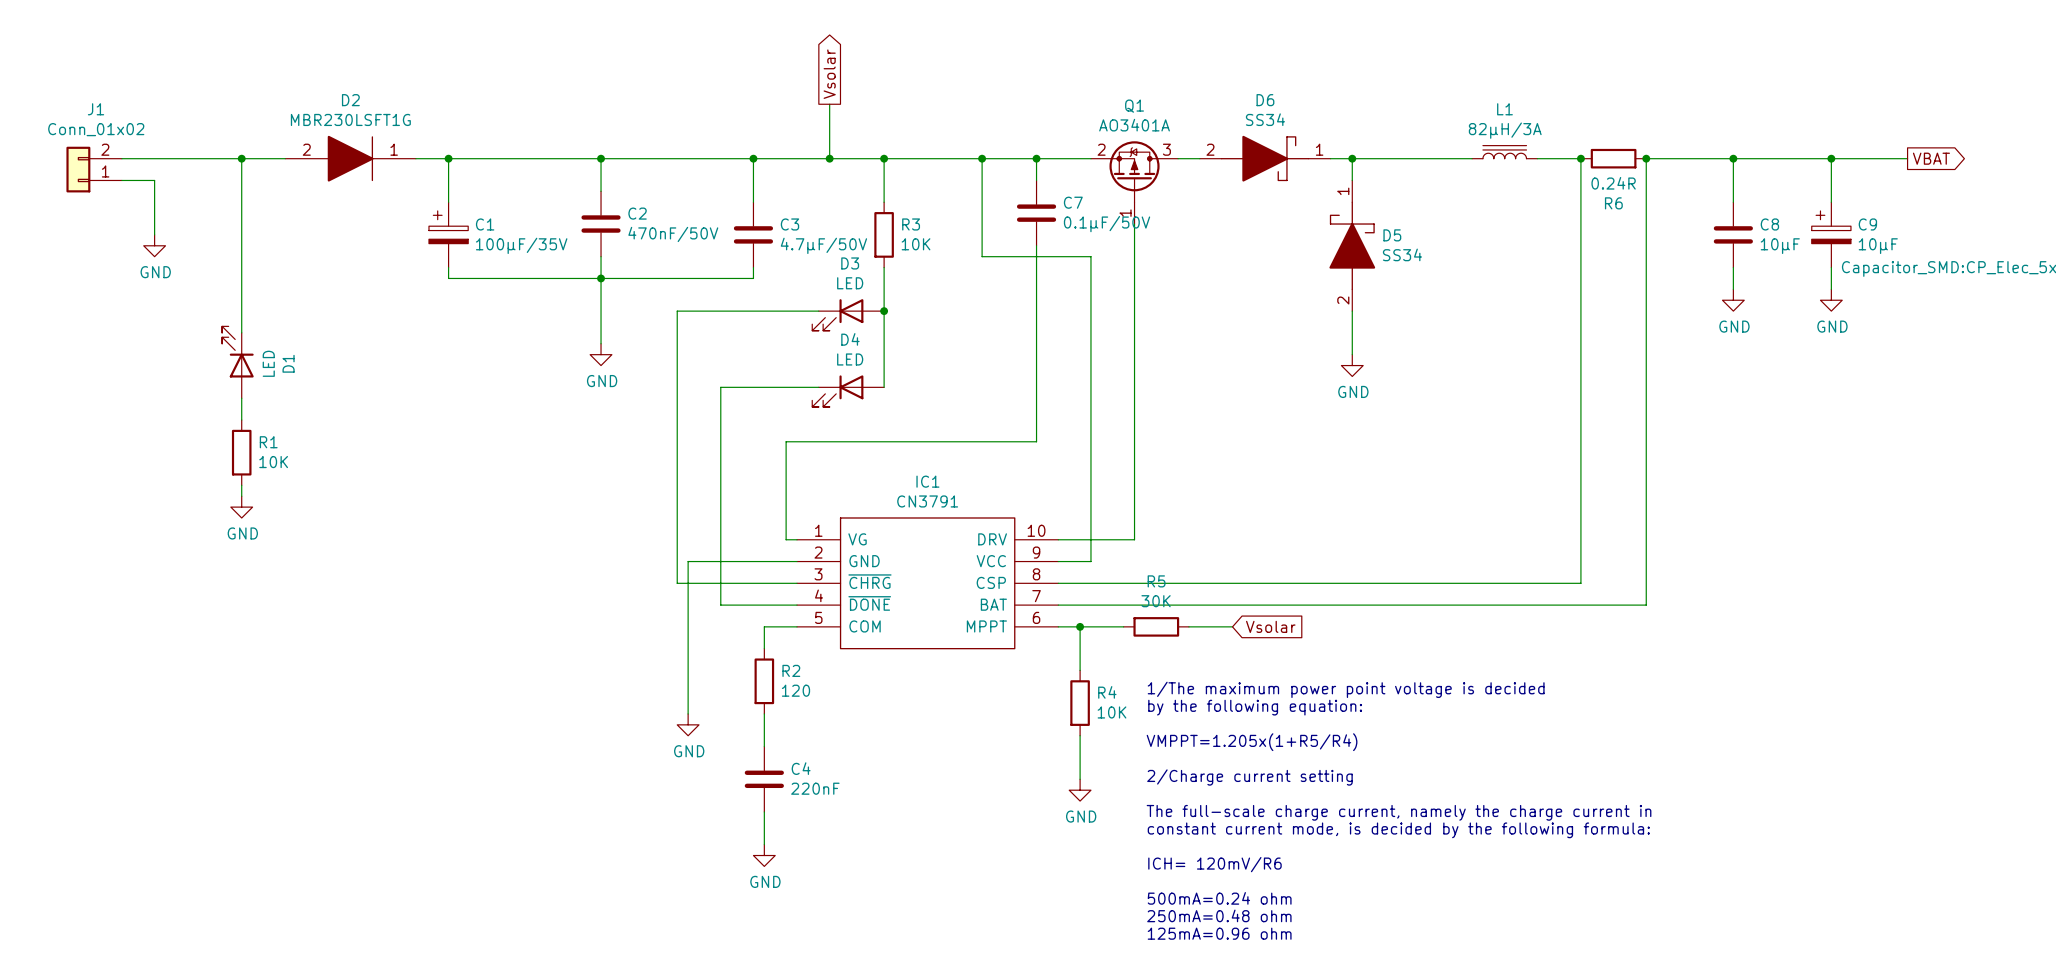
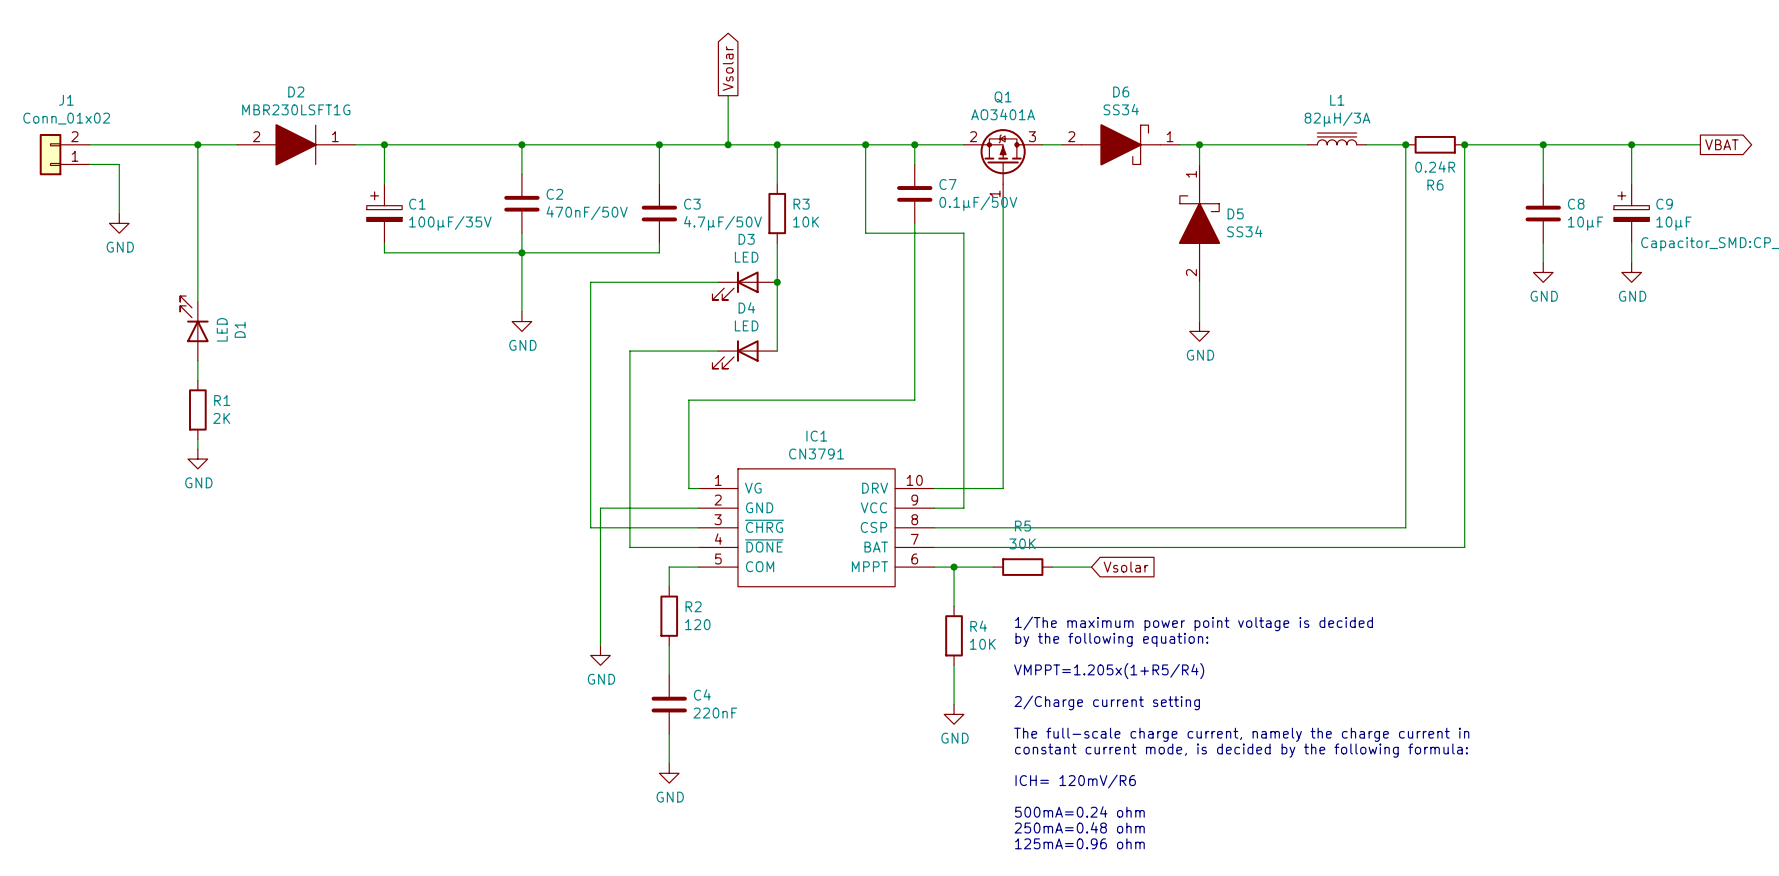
R1 value: 10K (273, 462) -> 2K (221, 418)

